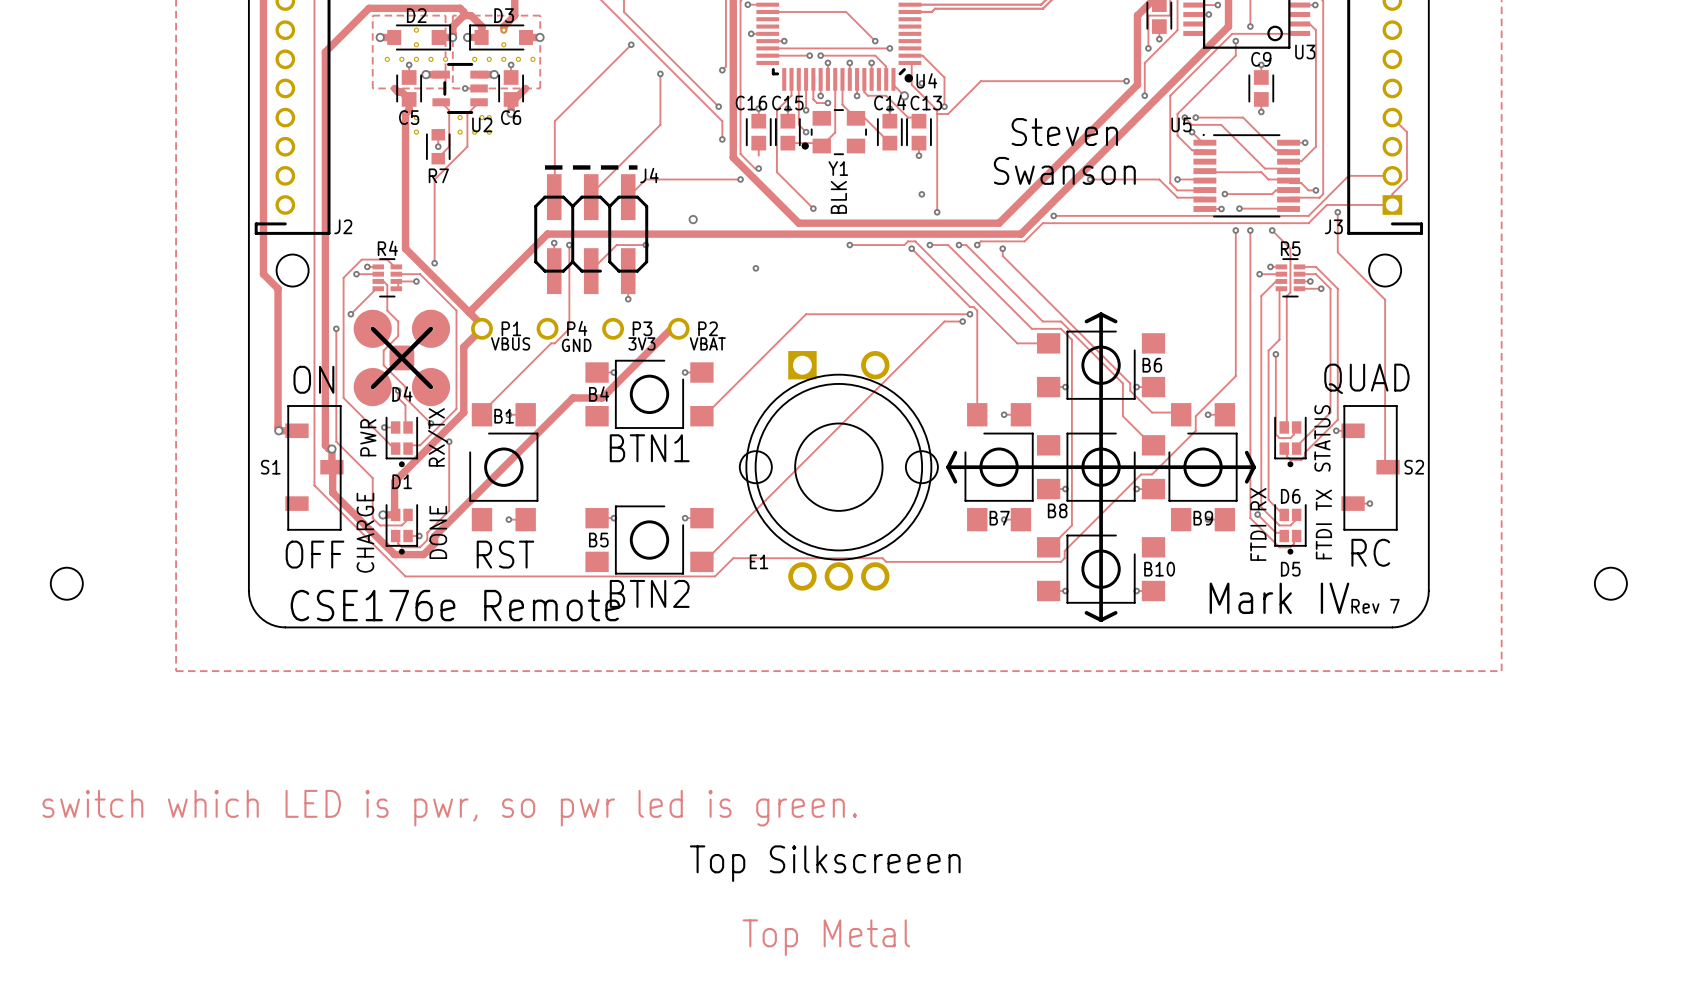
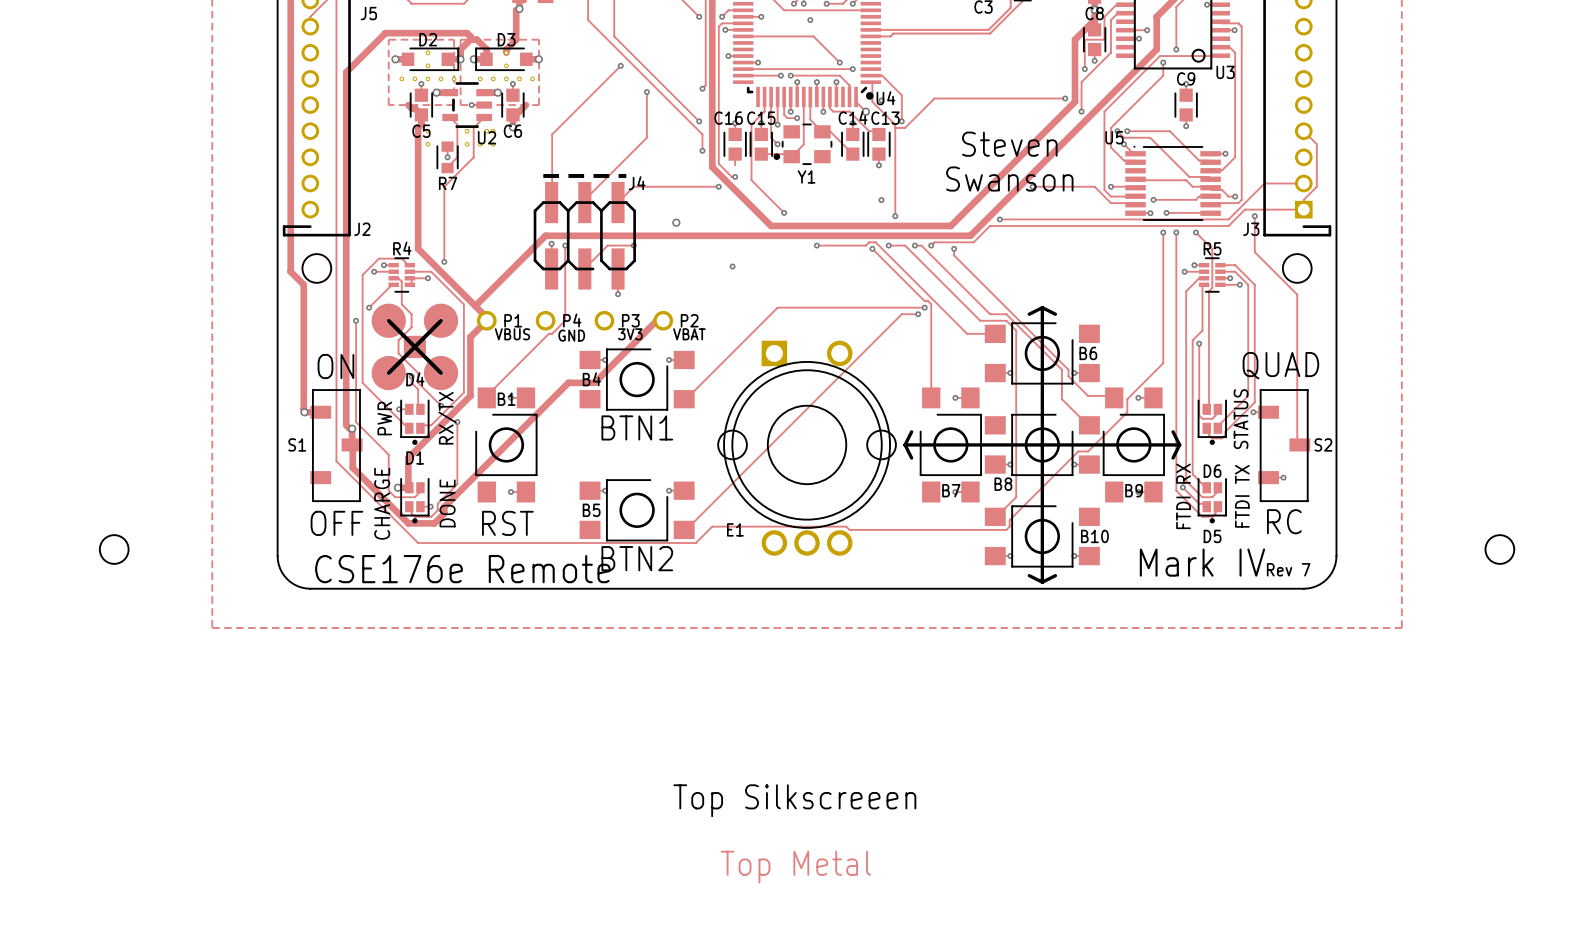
text: BLK (838, 197) -> none
text: switch which LED is pwr, so pwr led is green. (449, 808) -> none

